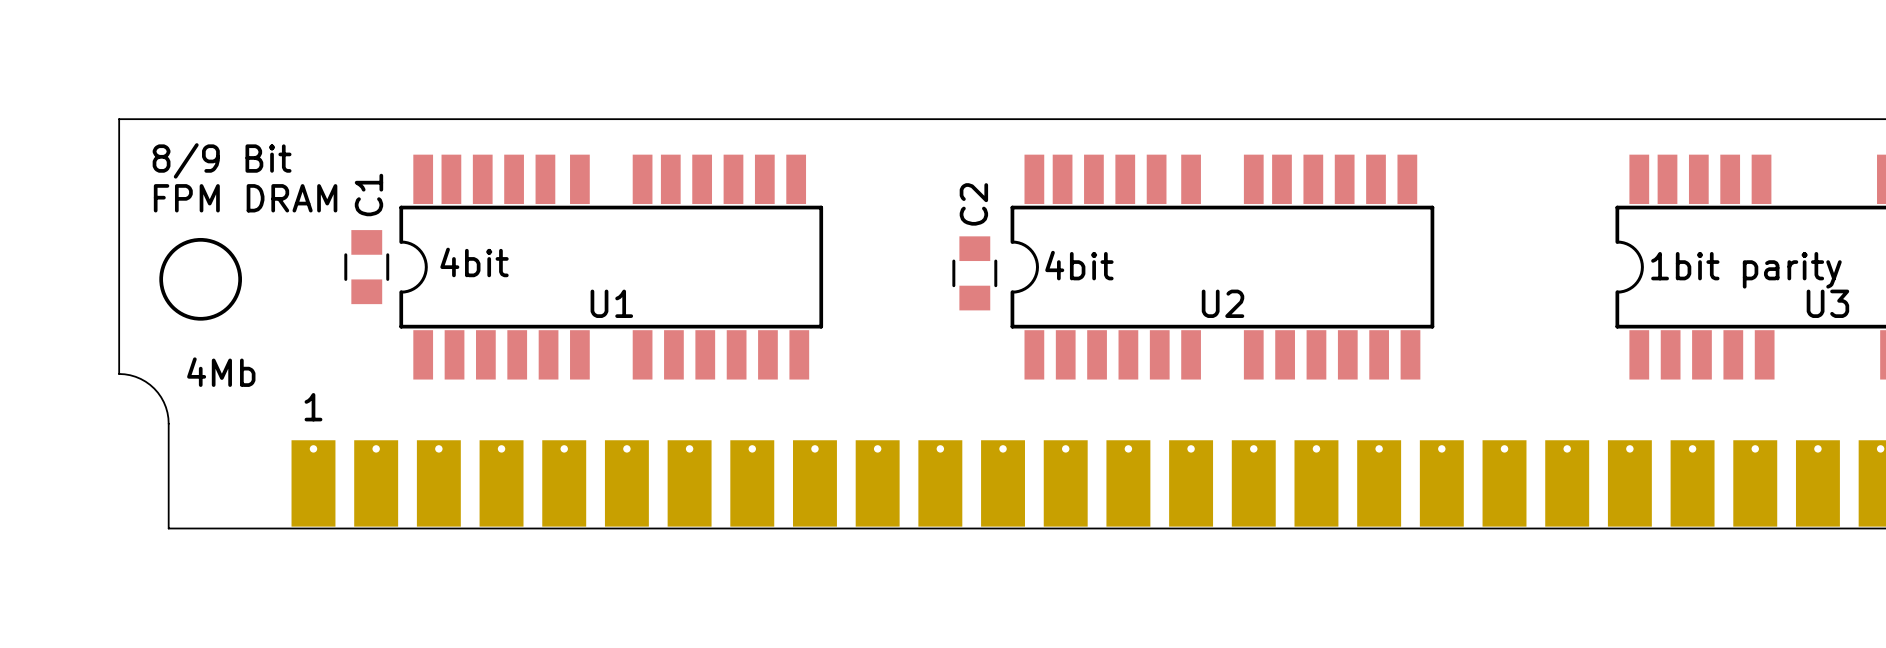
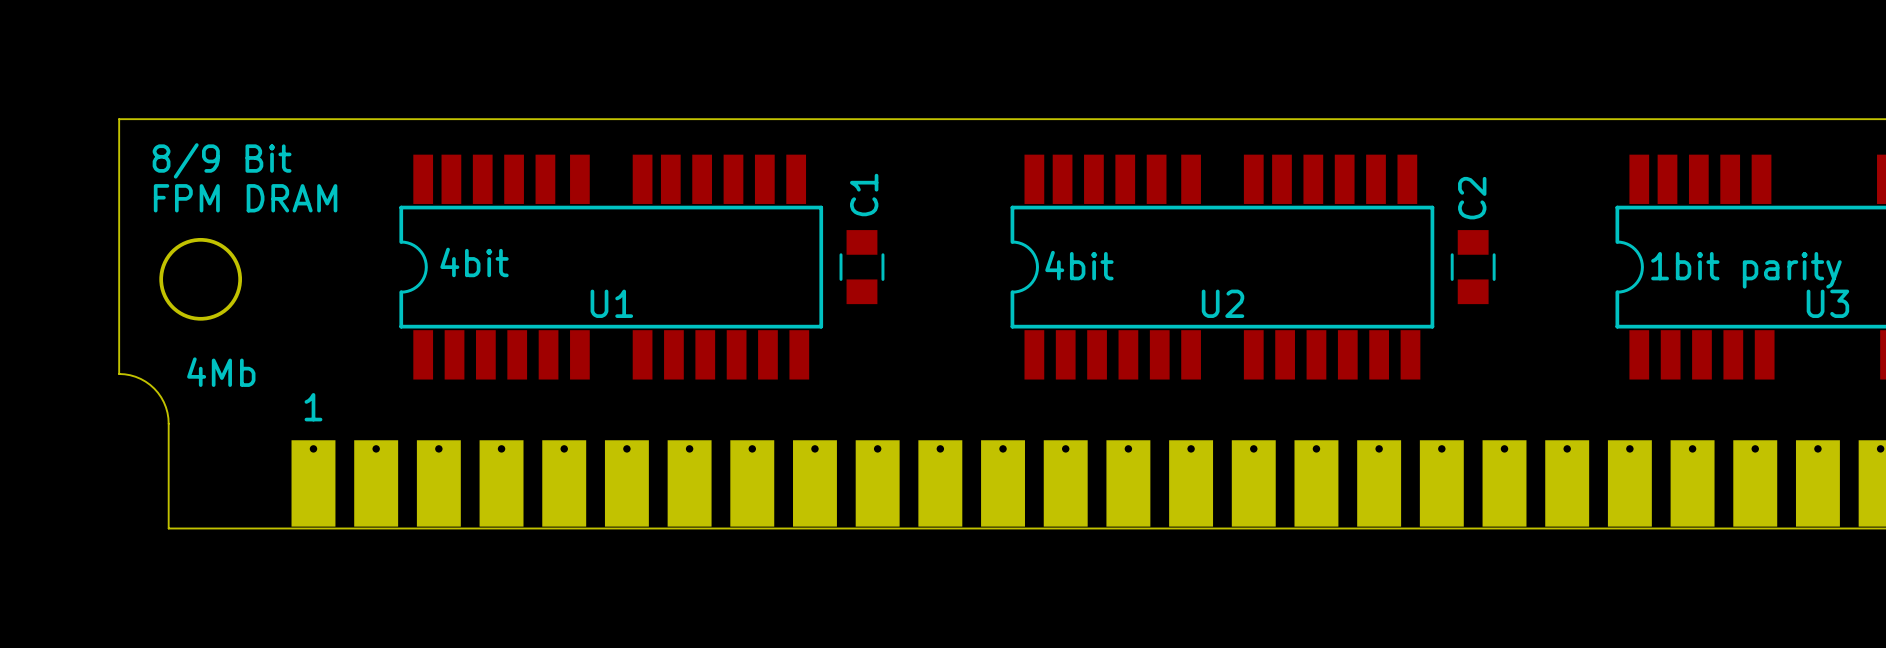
C1 position: (366, 267) -> (861, 267)
C2 position: (974, 273) -> (1473, 267)

